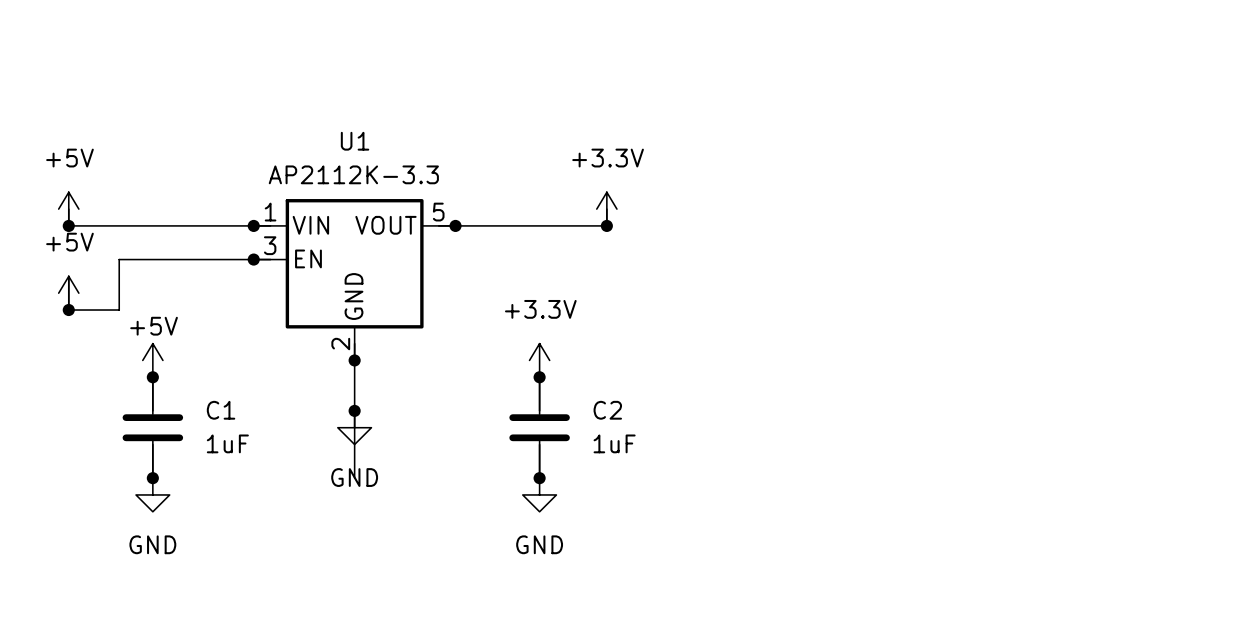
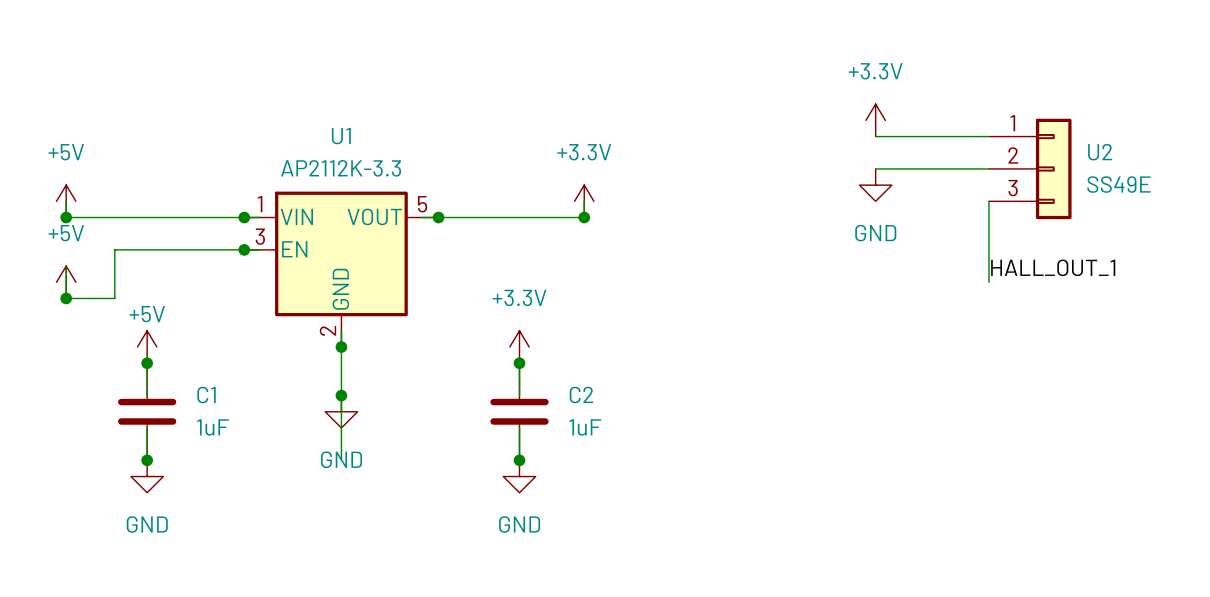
power symbol: none -> +3.3V (875, 120)
wire: none -> (875, 136) (988, 136)
wire: none -> (875, 168) (988, 168)
U2: none -> SS49E (1030, 168)
power symbol: none -> GND (875, 185)
wire: none -> (988, 201) (988, 282)
label: none -> HALL_OUT_1 (1053, 267)

